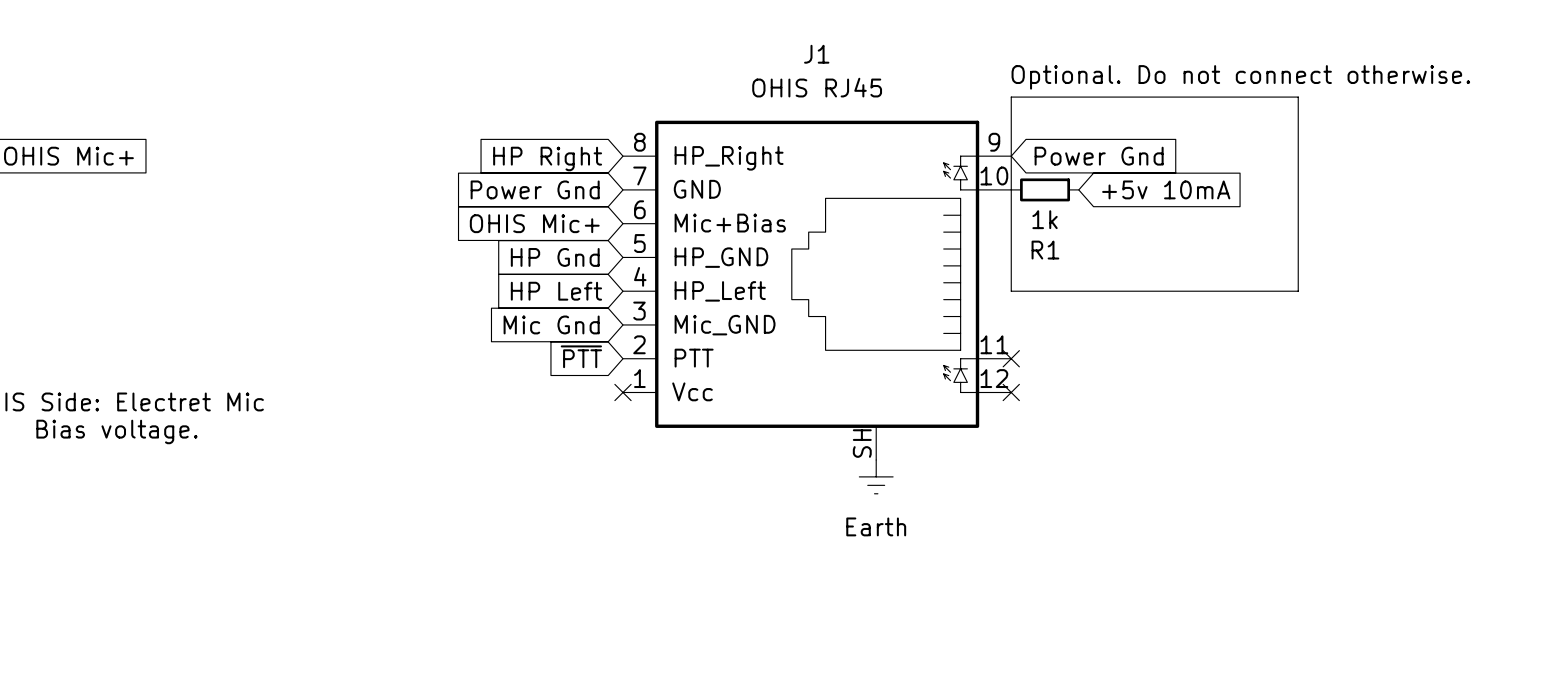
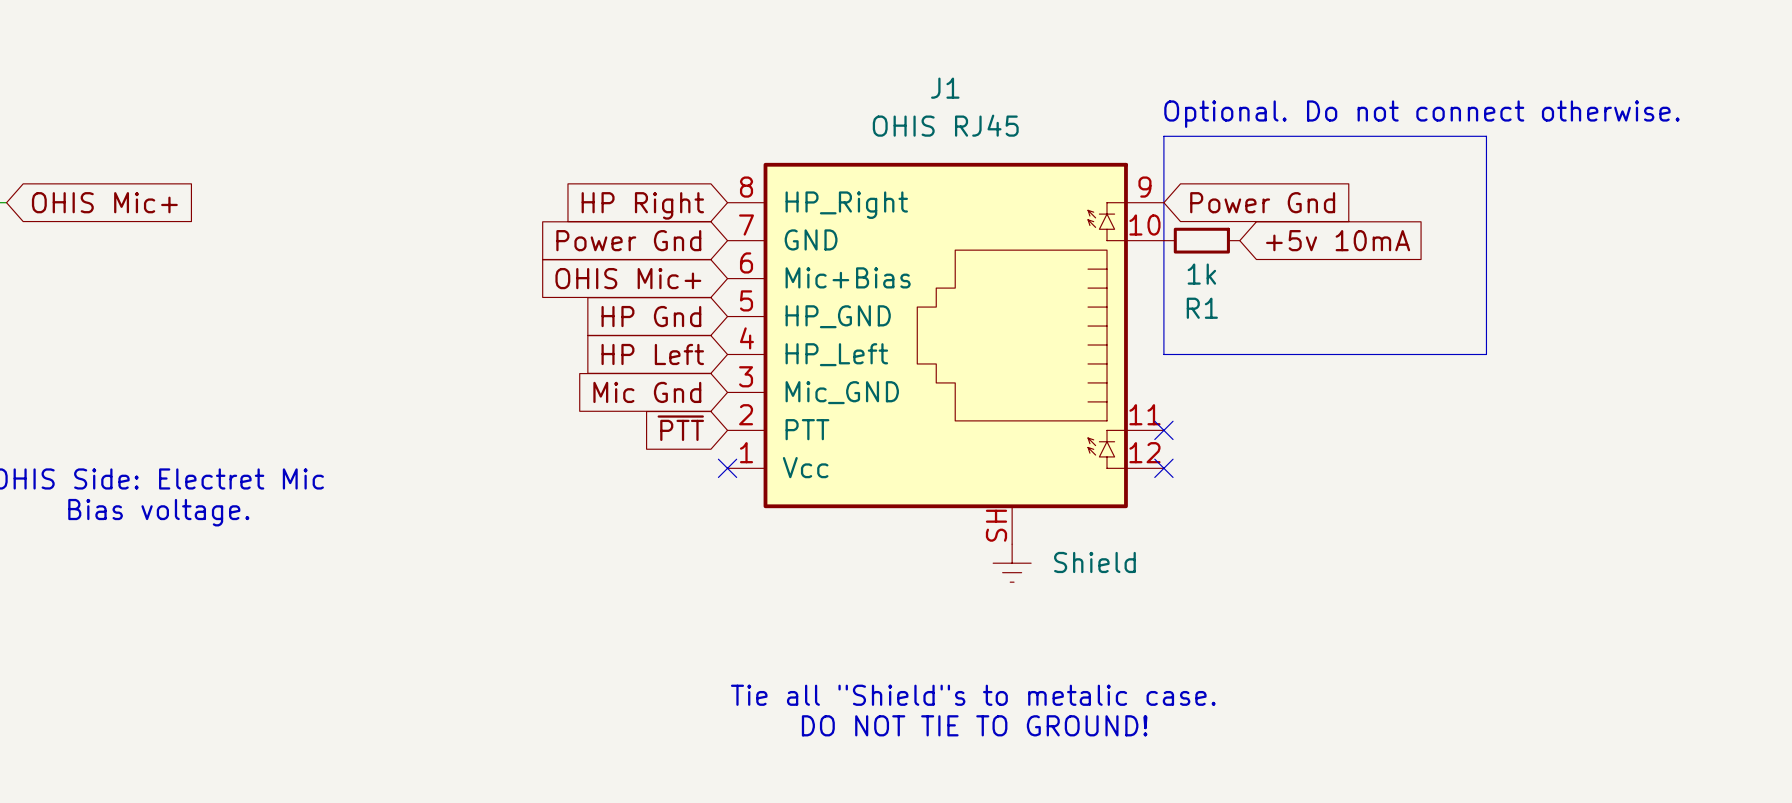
power symbol: Earth (876, 476) -> Shield (1012, 563)
text: none -> Tie all "Shield"s to metalic case. (973, 695)
text: none -> DO NOT TIE TO GROUND! (974, 725)

